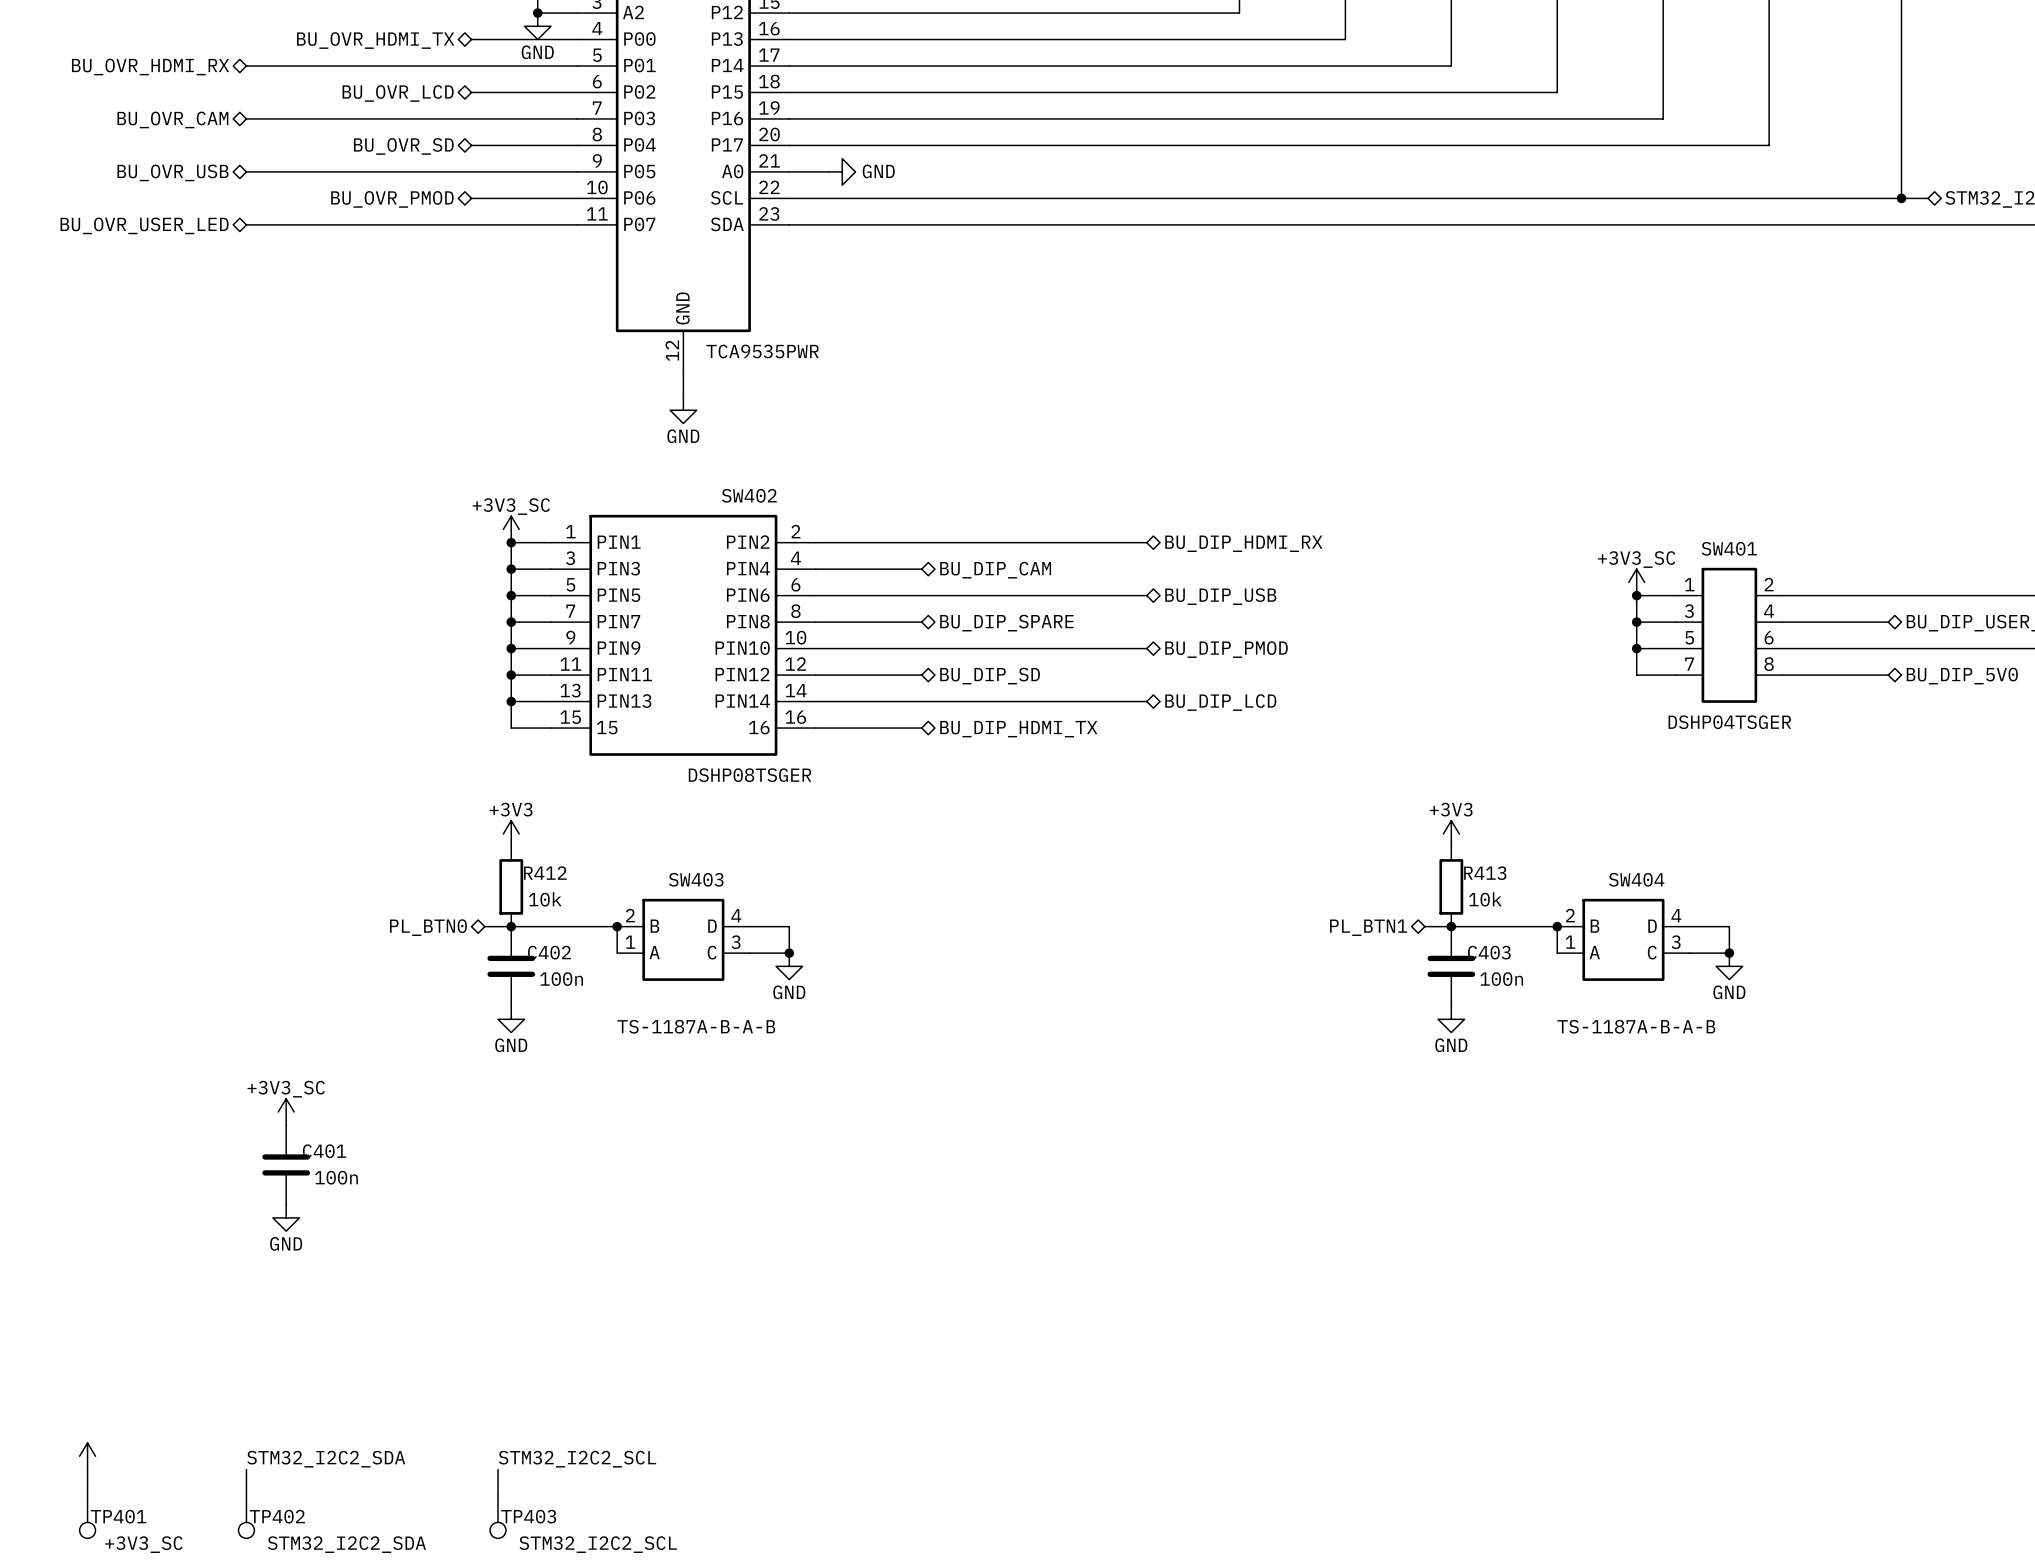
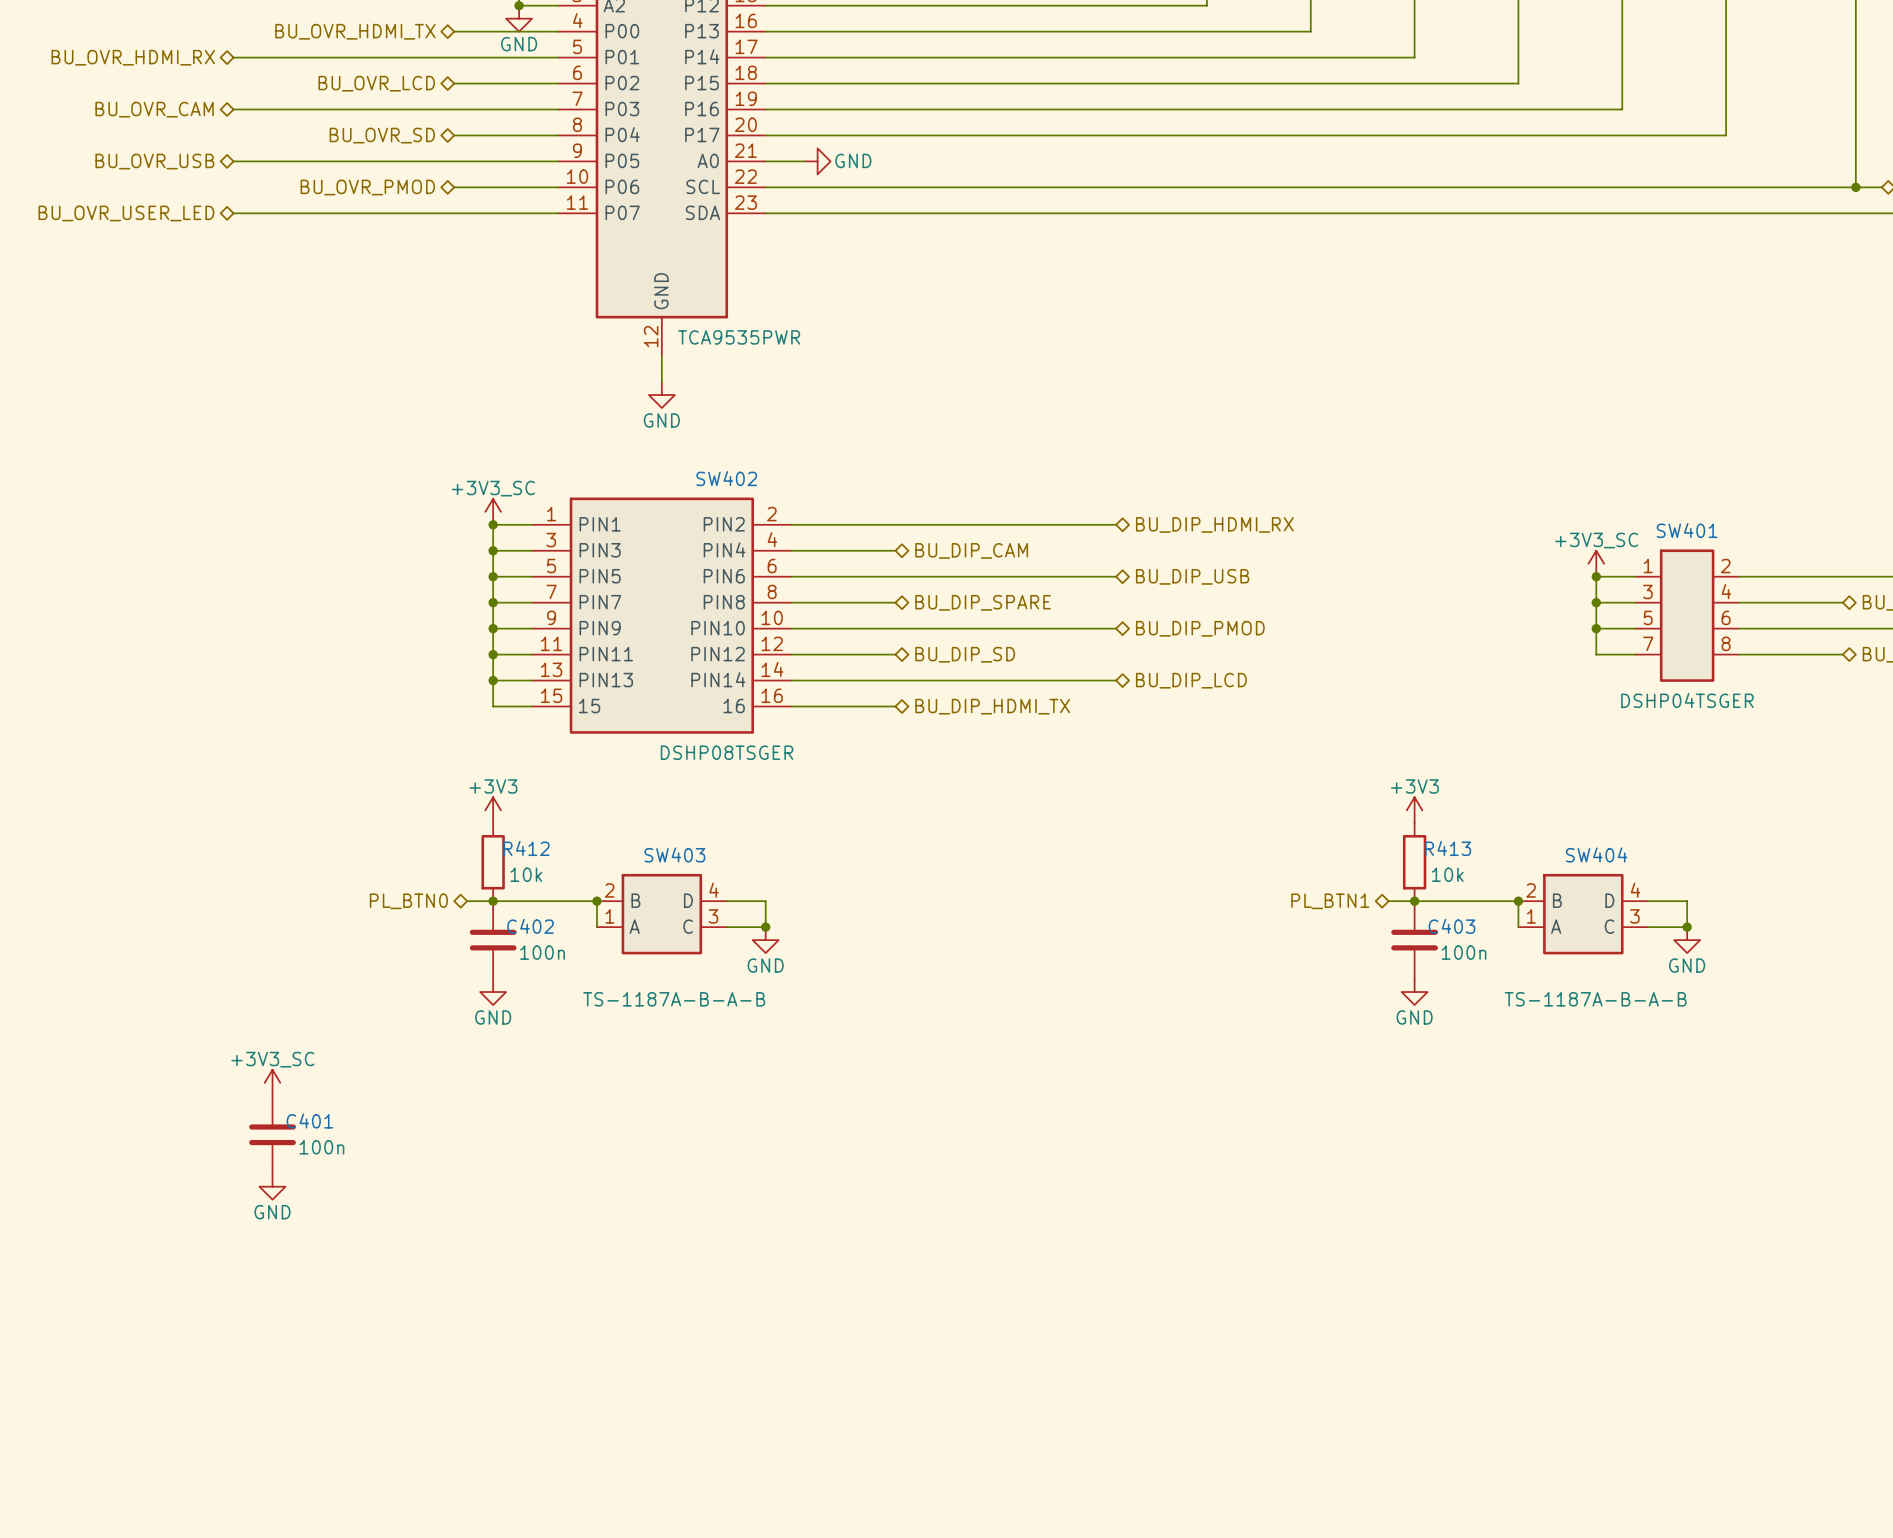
power symbol: (87, 1456) -> none
label: STM32_I2C2_SDA (326, 1459) -> none
label: STM32_I2C2_SCL (577, 1459) -> none
wire: (87, 1469) (87, 1495) -> none
wire: (246, 1469) (246, 1495) -> none
wire: (498, 1469) (498, 1495) -> none
TP401: +3V3_SC (87, 1517) -> none
TP402: STM32_I2C2_SDA (246, 1517) -> none
TP403: STM32_I2C2_SCL (498, 1517) -> none

